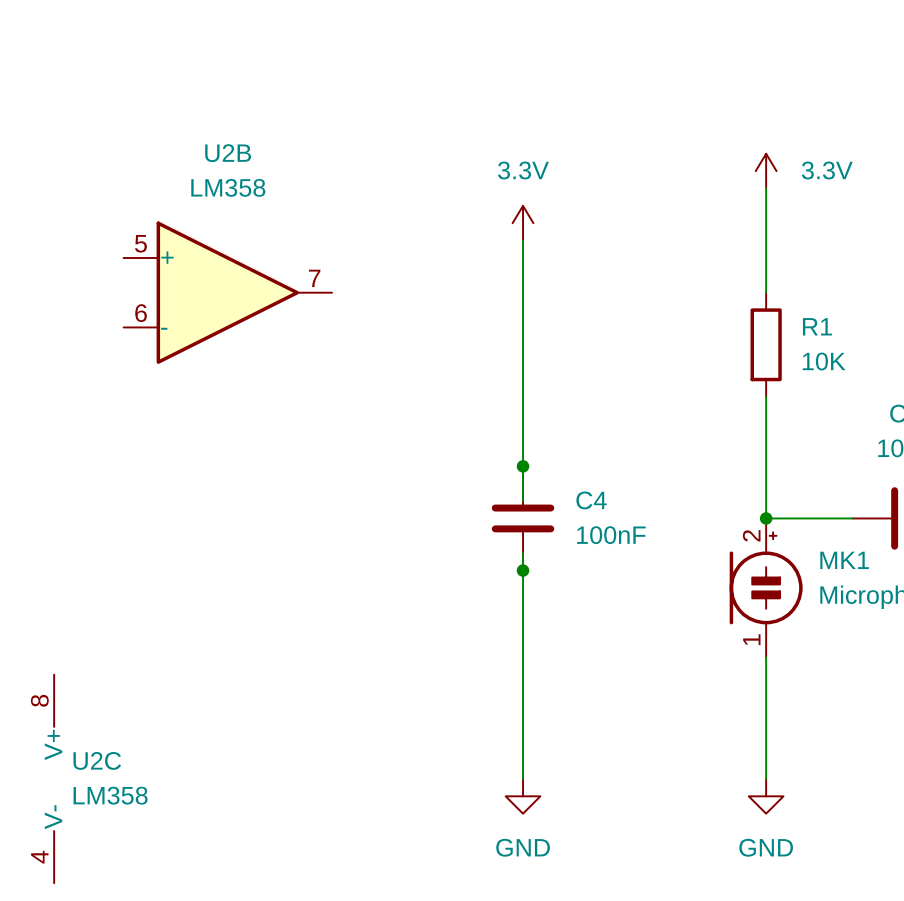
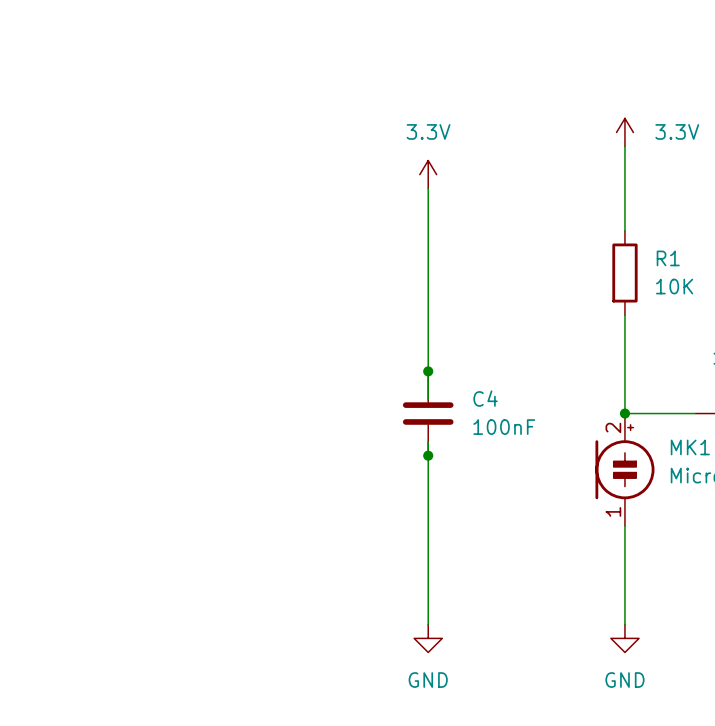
U2B: LM358 (227, 292) -> none
U2C: LM358 (54, 778) -> none

